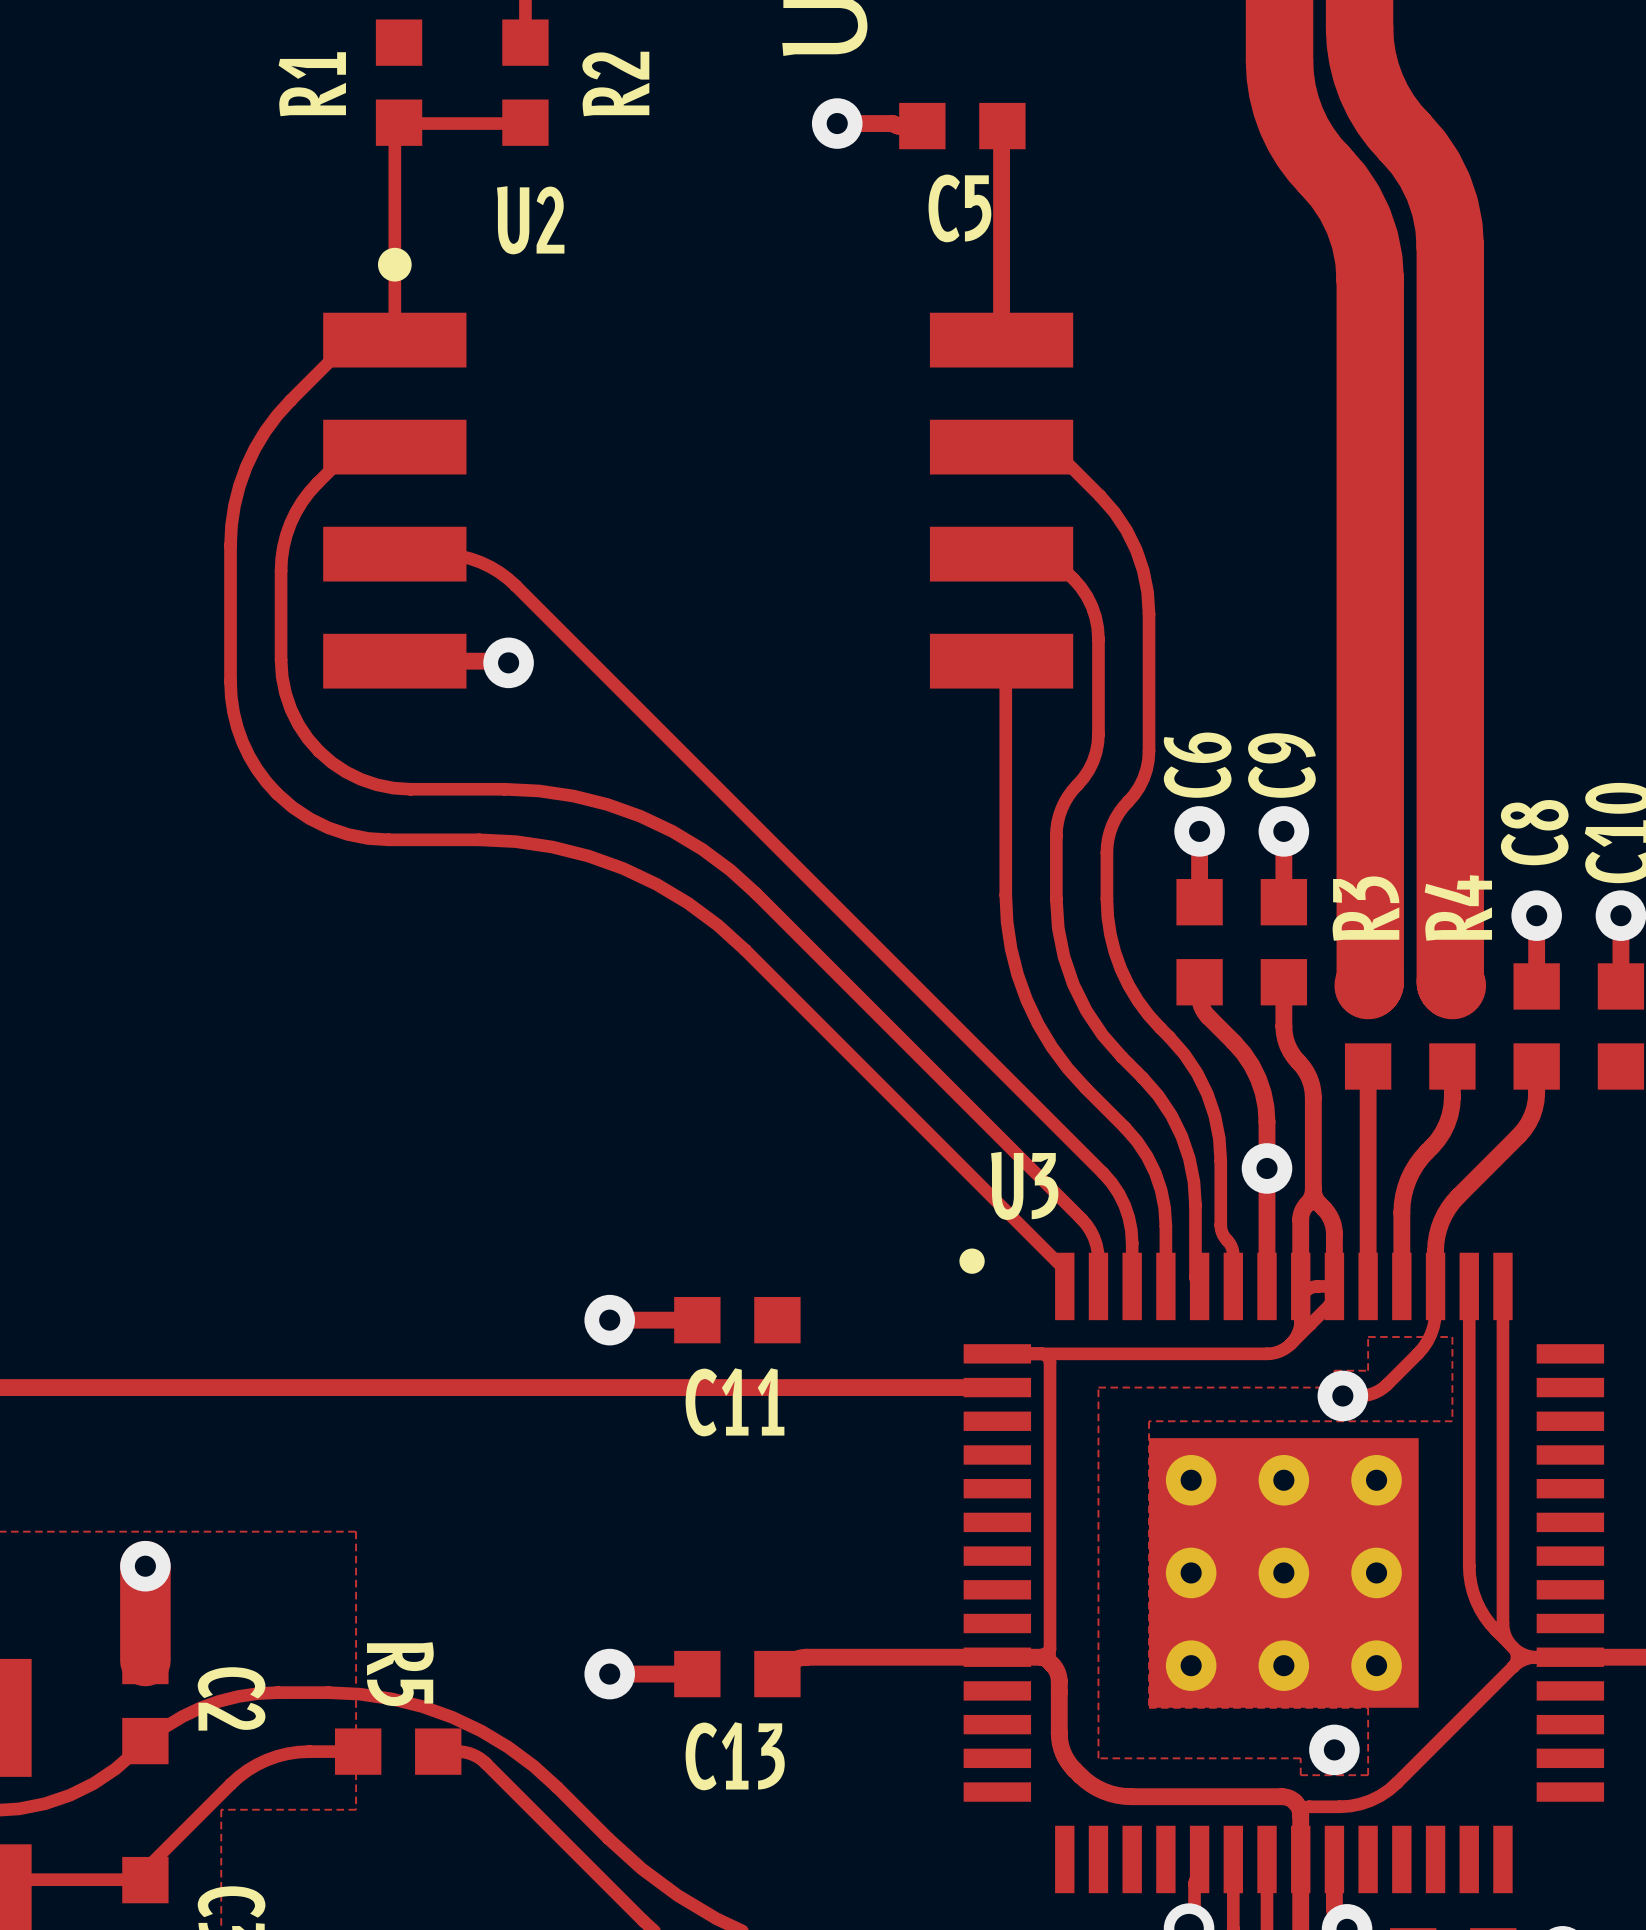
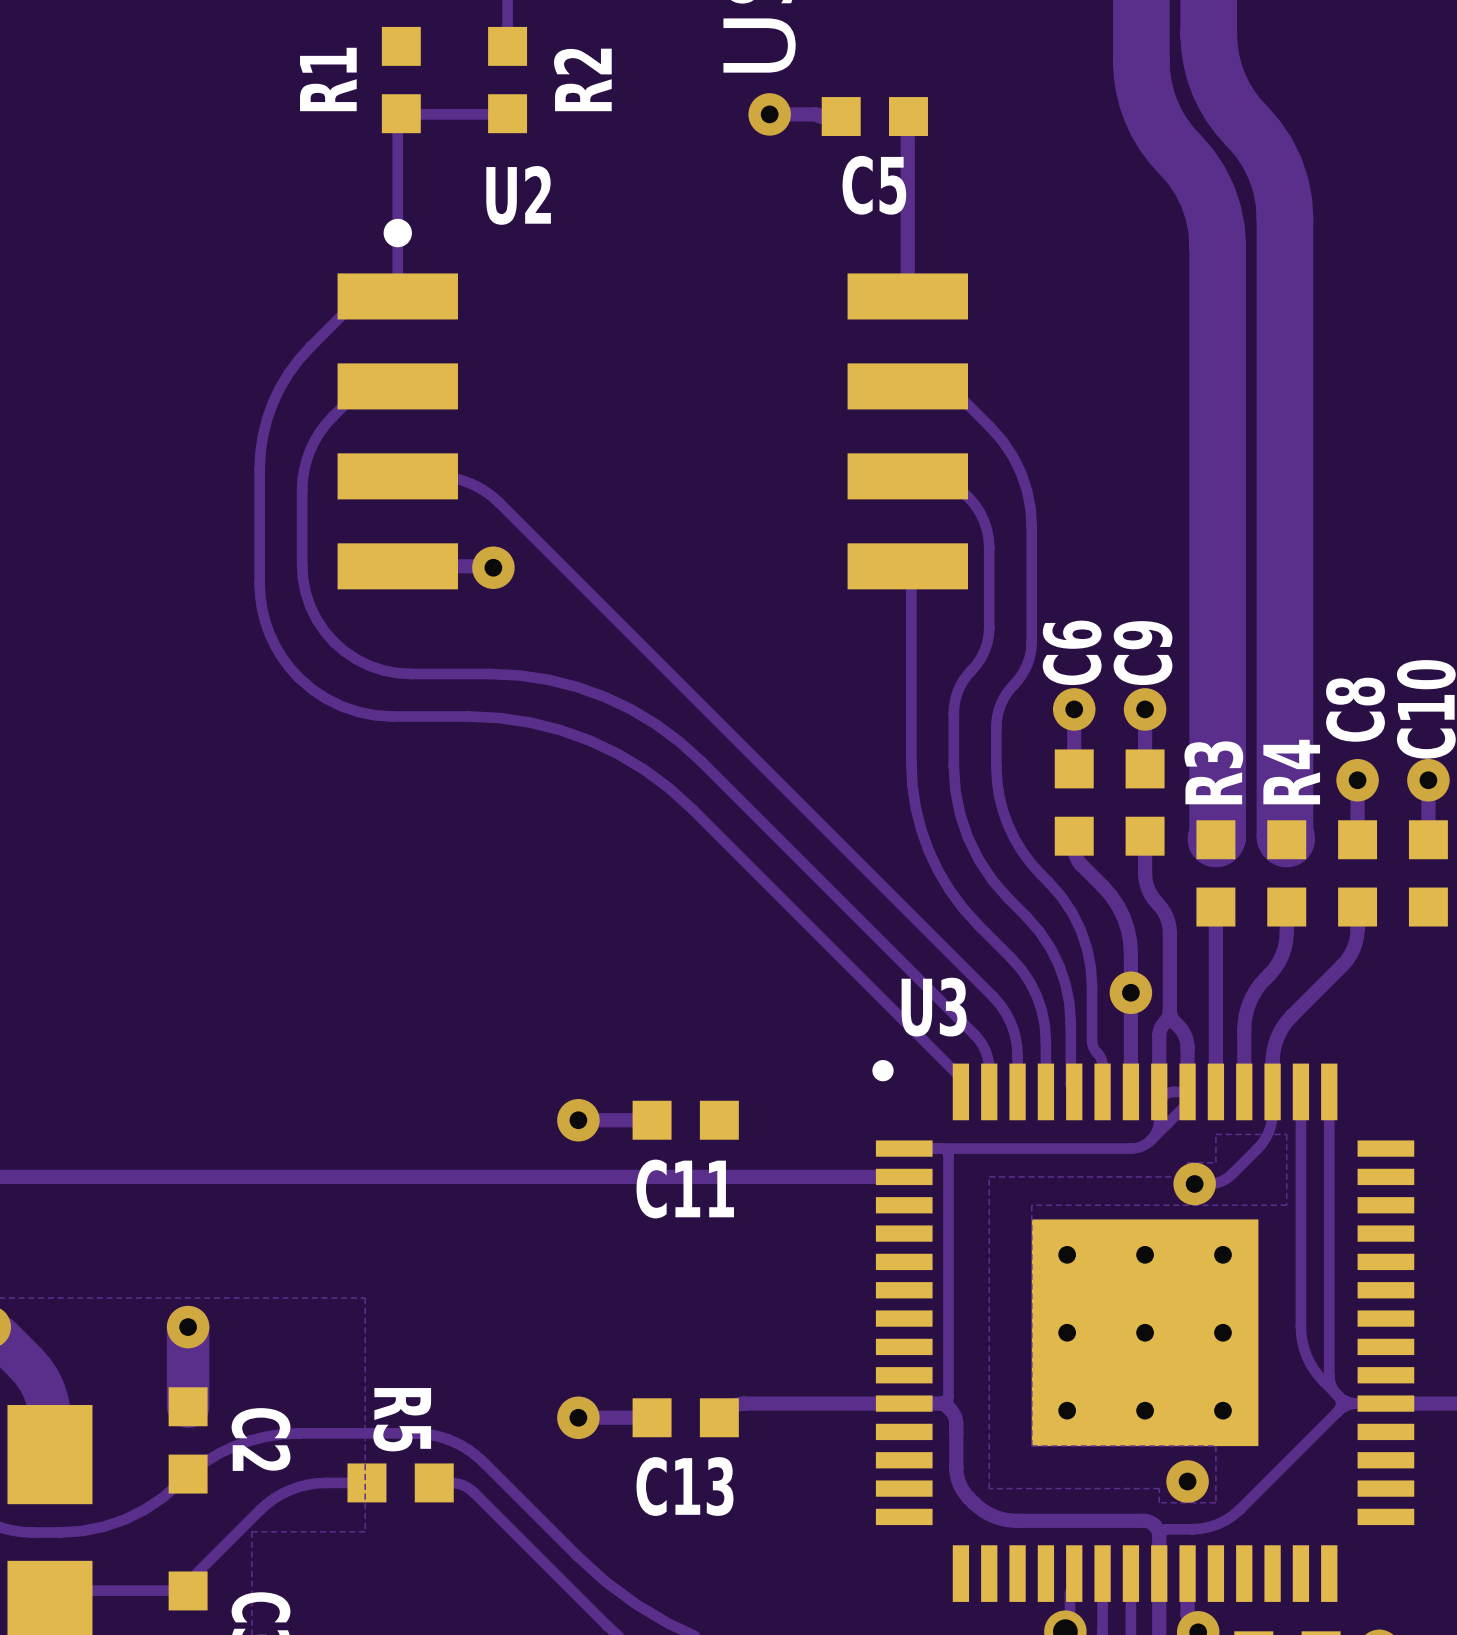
track: (328, 1692) (360, 1694) (391, 1698) (422, 1706) (452, 1717) (480, 1730) (508, 1747) (533, 1766) (557, 1787) -> (341, 1433) (417, 1433) (447, 1439) (474, 1454) (534, 1513)

